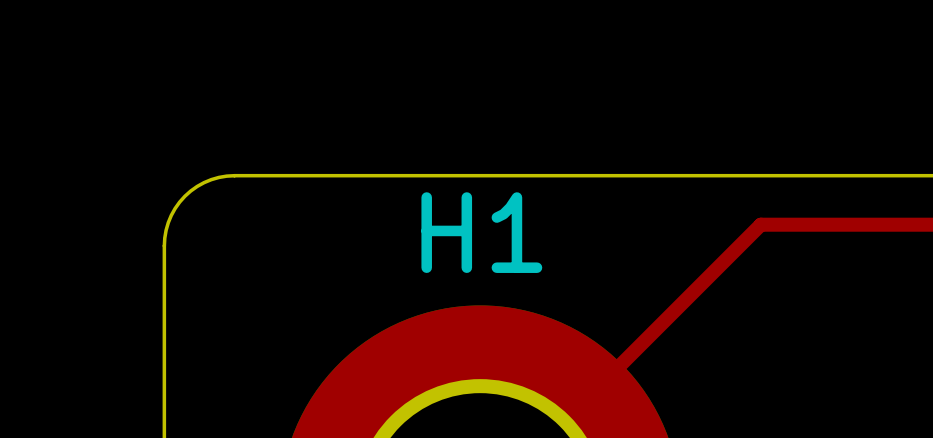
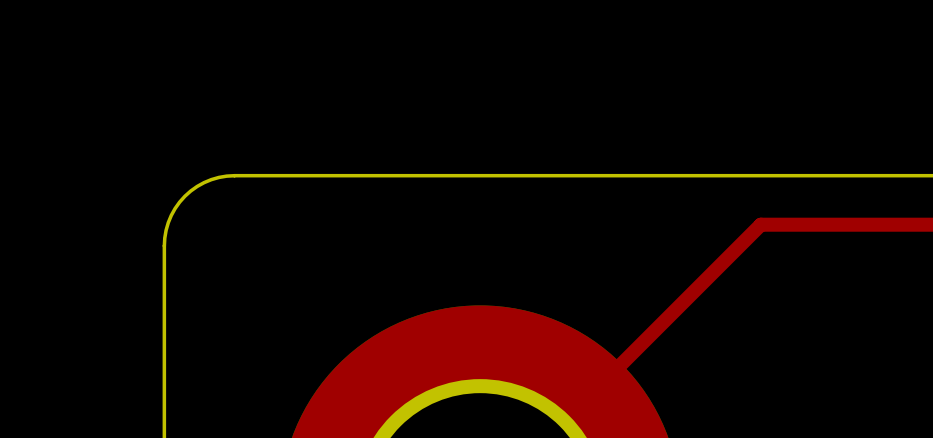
H1 name: H1 (481, 232) -> none

